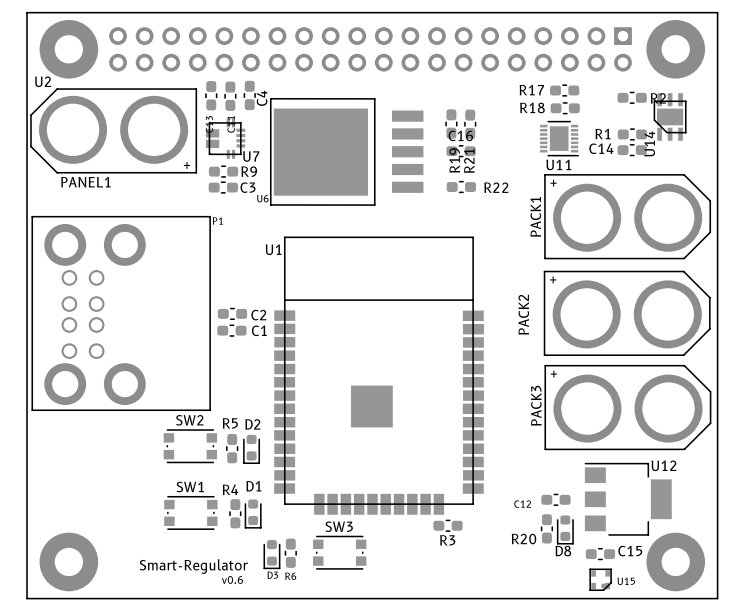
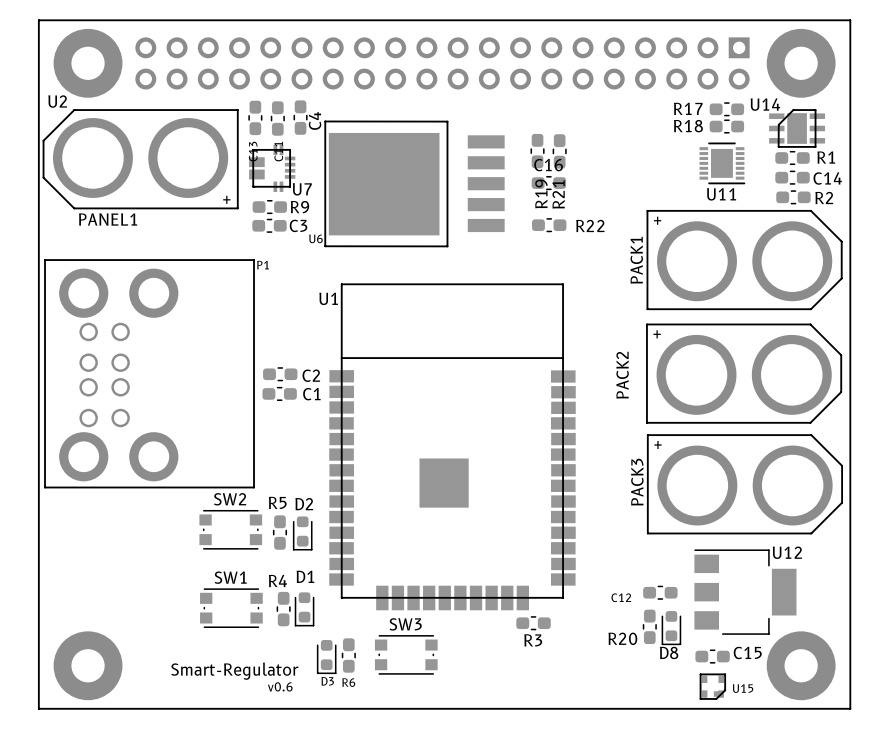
R17 position: (564, 90) -> (726, 109)
R2 position: (632, 97) -> (793, 197)
R18 position: (565, 108) -> (726, 126)
U14 rotation: 0° (670, 116) -> 90° clockwise (797, 128)
R1 name position: R1 (603, 134) -> R1 (826, 157)
R1 position: (632, 134) -> (792, 157)
U11 position: (559, 138) -> (722, 163)
C14 name position: C14 (601, 148) -> C14 (827, 178)
C14 position: (632, 150) -> (792, 177)

